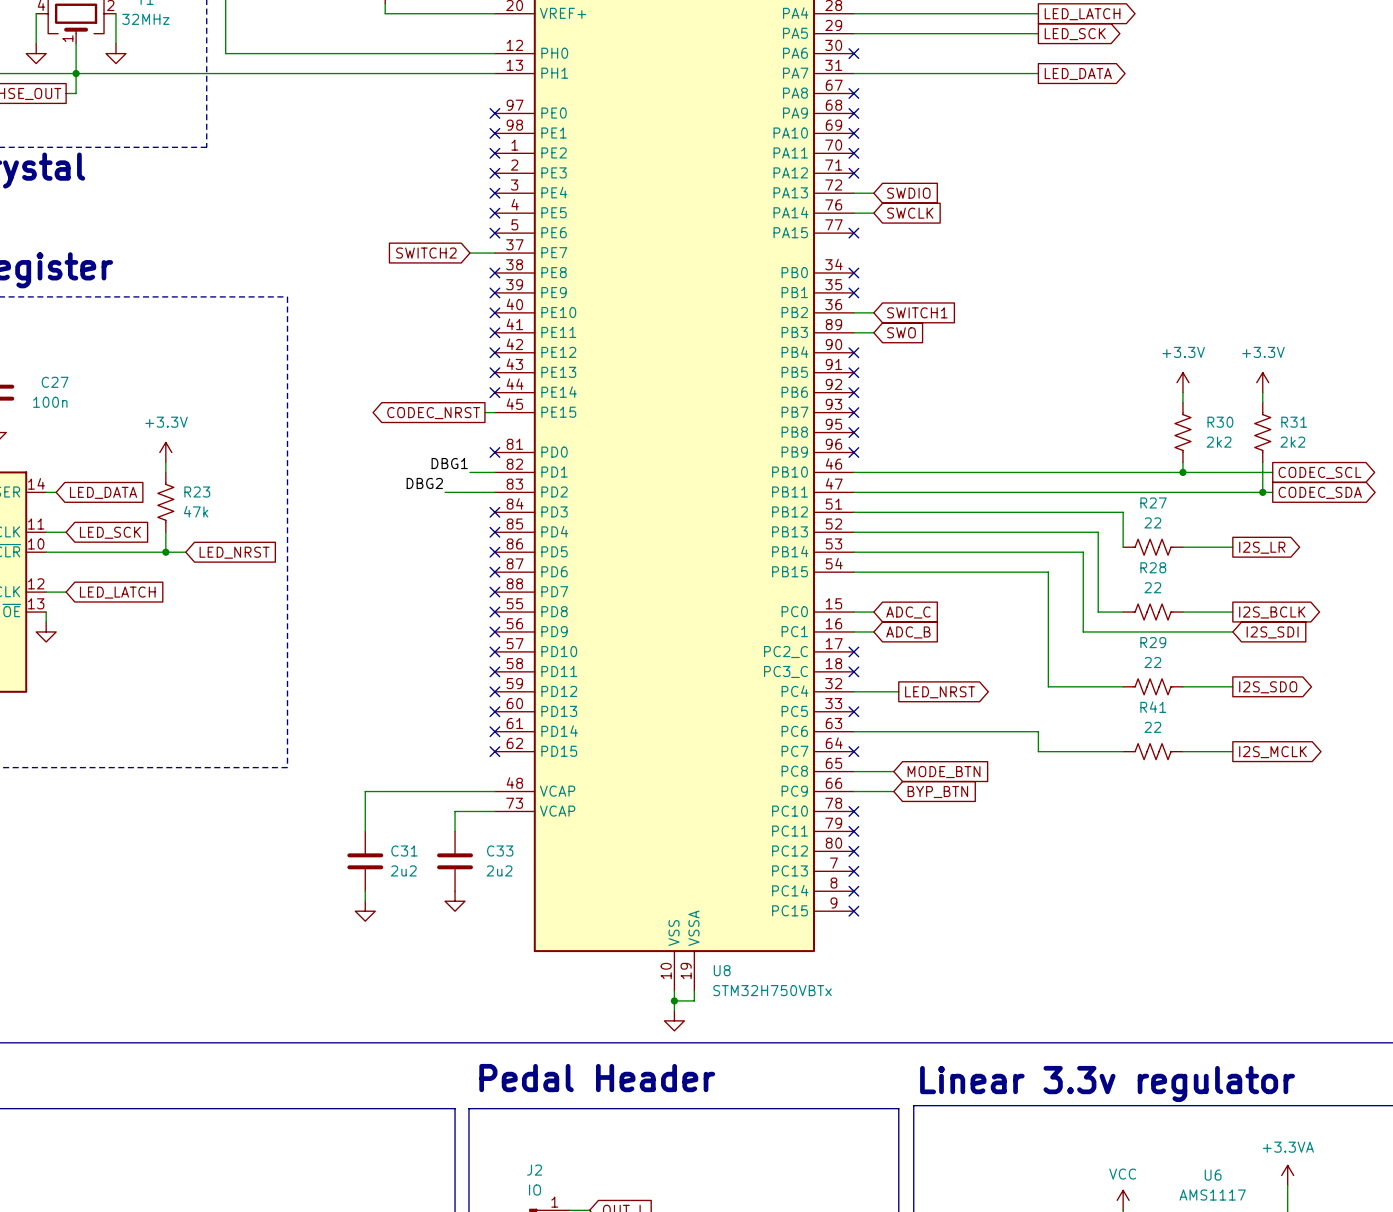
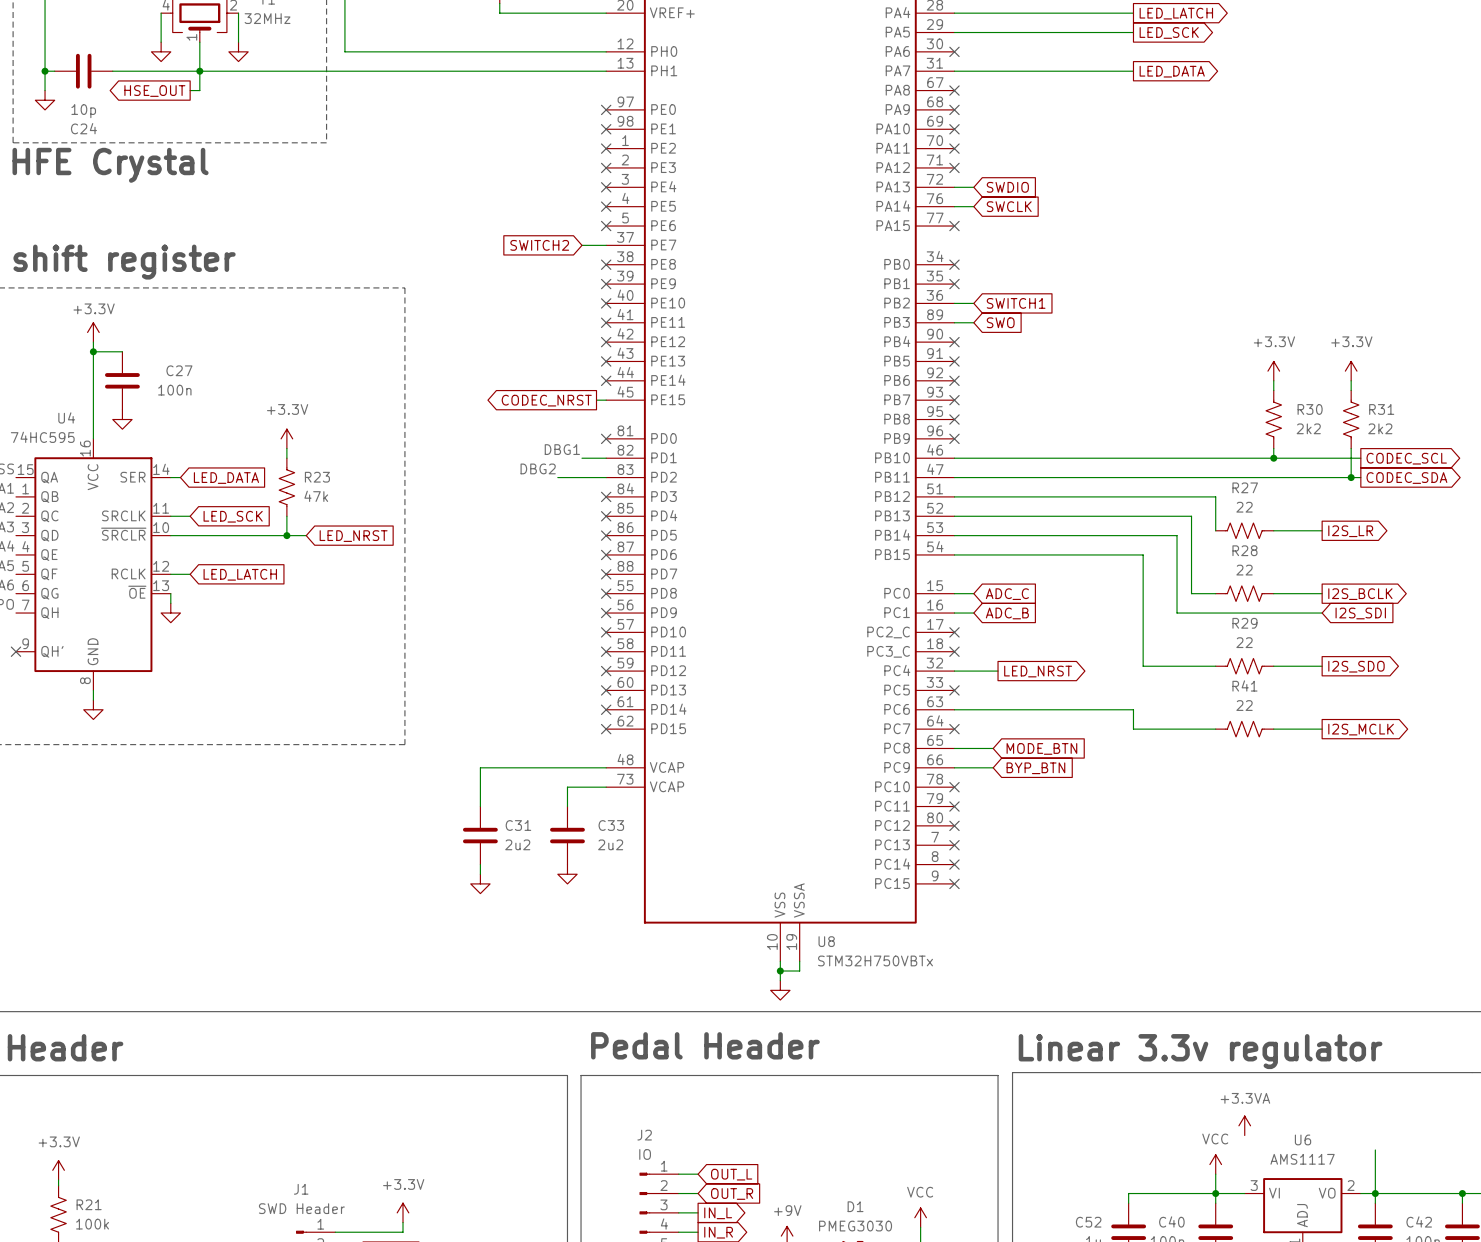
power symbol position: +3.3VA (1287, 1175) -> +3.3VA (1244, 1125)

